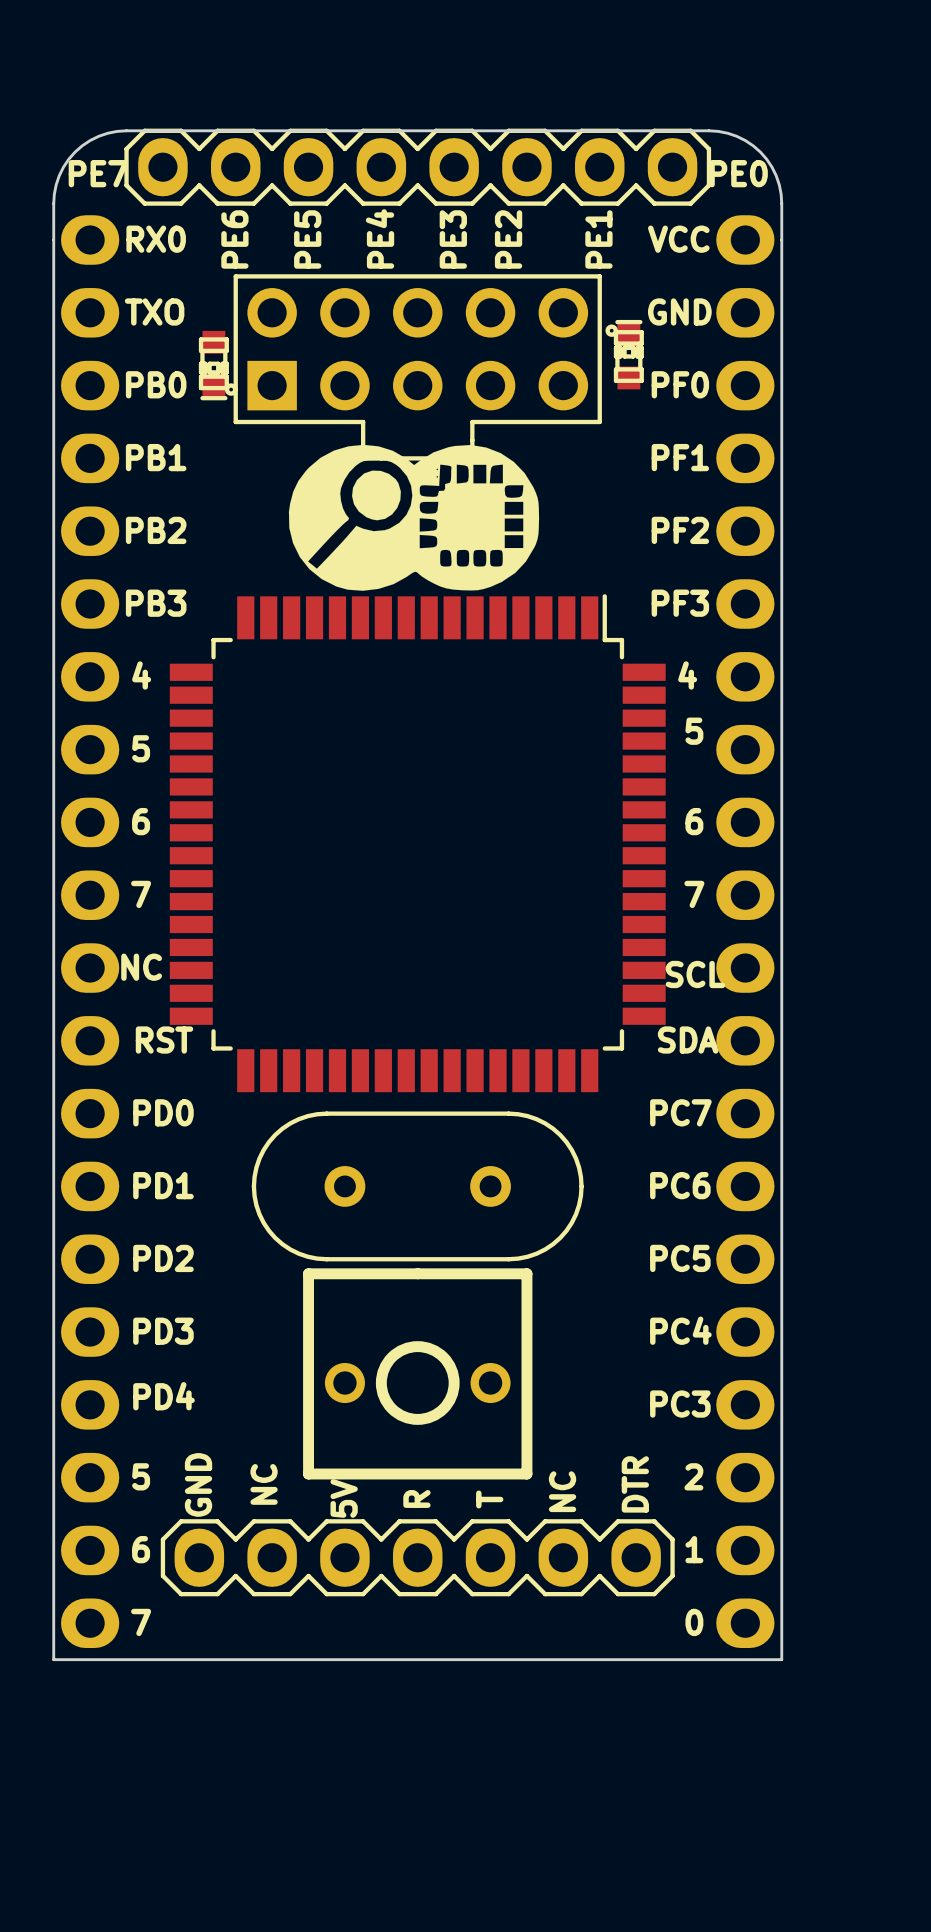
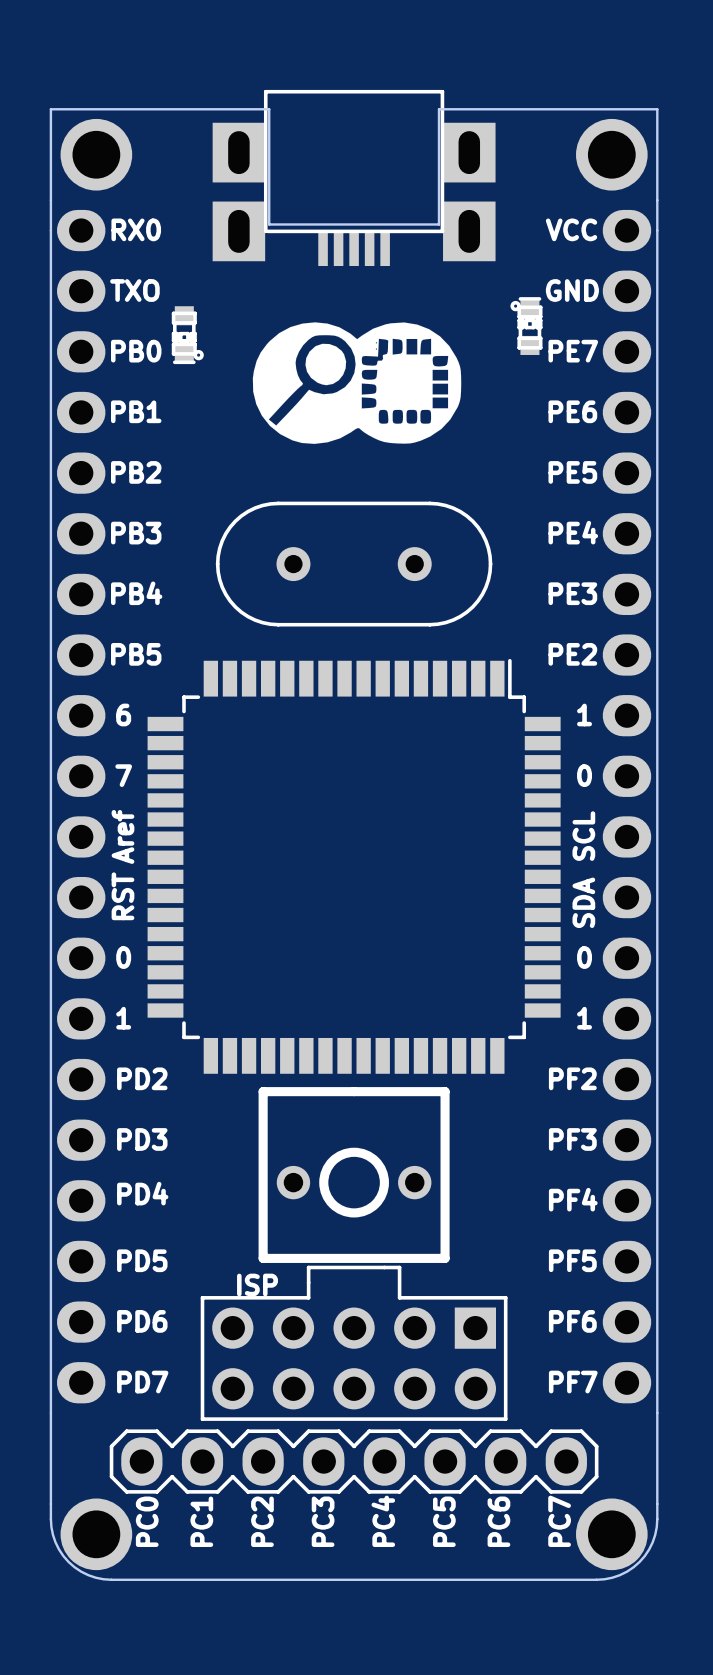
part footprint: [124, 128, 712, 206] -> [212, 89, 496, 267]
part: none -> (96, 154)
part: none -> (611, 154)
text: PE7 (98, 173) -> none
text: PE0 (738, 173) -> none
board edge: (53, 203) (59, 175) (75, 152) (90, 140) (117, 131) (708, 130) (736, 136) (760, 152) (776, 175) (781, 203) -> (50, 200) (50, 109) (269, 109) (269, 224) (438, 224) (438, 109) (657, 109) (657, 200)
text: PE4 (380, 238) -> none
text: PE6 (234, 239) -> none
text: PE5 (307, 239) -> none
text rotation: 0° (453, 239) -> 90° clockwise (572, 593)
text position: PE3 (453, 239) -> PE3 (572, 593)
text rotation: 0° (508, 239) -> 90° clockwise (572, 654)
text position: PE2 (508, 239) -> PE2 (572, 654)
text: PE1 (598, 239) -> none
part: (417, 367) -> none
text: PF0 (680, 384) -> PE7 (573, 351)
text: PF1 (680, 457) -> PE6 (572, 411)
drawing position: (413, 517) -> (357, 383)
text: PF2 (680, 530) -> PE5 (572, 472)
text: PF3 (680, 603) -> PE4 (573, 532)
text: 4 (141, 675) -> PB4 (136, 593)
text: 4 (687, 675) -> none
text: 5 (694, 731) -> none
text: 5 (141, 748) -> PB5 (136, 654)
text: 6 (694, 821) -> 1 (584, 714)
part position: (417, 843) -> (354, 866)
text: 7 (694, 894) -> 0 (584, 775)
text: NC (141, 967) -> Aref (122, 836)
text rotation: 0° (695, 974) -> 90° counterclockwise (583, 836)
text rotation: 0° (164, 1040) -> 90° counterclockwise (122, 896)
text rotation: 0° (688, 1040) -> 90° counterclockwise (583, 902)
text: PD0 (163, 1112) -> 0 (123, 957)
text rotation: 0° (680, 1112) -> 90° counterclockwise (559, 1521)
text position: PC7 (680, 1112) -> PC7 (559, 1521)
text: none -> 0 (584, 957)
text: PD1 (163, 1185) -> 1 (123, 1018)
text rotation: 0° (680, 1185) -> 90° counterclockwise (498, 1521)
text position: PC6 (680, 1185) -> PC6 (498, 1521)
text: none -> 1 (584, 1018)
part position: (417, 1186) -> (354, 564)
text: PC5 (680, 1258) -> PF2 (572, 1078)
text: PC4 (680, 1330) -> PF3 (572, 1139)
text: PC3 (680, 1404) -> PF4 (573, 1199)
text: 5 (141, 1476) -> none
text: none -> PD5 (142, 1260)
text: 2 (693, 1476) -> PF5 (572, 1260)
text: GND (198, 1484) -> none
text: NC (264, 1484) -> none
text: DTR (635, 1484) -> none
text: NC (562, 1491) -> none
text: 5V (344, 1498) -> none
text: R (416, 1498) -> none
text: T (489, 1499) -> none
text: none -> ISP (257, 1285)
part footprint: [160, 1519, 675, 1597] -> [200, 1265, 508, 1421]
text: 6 (141, 1549) -> PD6 (142, 1321)
text: 1 (694, 1549) -> PF6 (572, 1321)
text: 7 (141, 1622) -> PD7 (142, 1382)
text: 0 (694, 1622) -> PF7 (573, 1382)
board edge: (53, 1659) (781, 1659) -> (50, 1413) (50, 1519) (55, 1542) (63, 1556) (74, 1567) (95, 1577) (111, 1579) (596, 1579) (612, 1577) (626, 1571) (639, 1562) (649, 1549) (655, 1534) (657, 1519) (657, 1413)
part: none -> (354, 1461)
text: none -> PC4 (383, 1521)
text: none -> PC0 (147, 1521)
text: none -> PC1 (201, 1521)
text: none -> PC2 (262, 1521)
text: none -> PC3 (323, 1521)
text: none -> PC5 (444, 1521)
part: none -> (96, 1534)
part: none -> (611, 1534)

